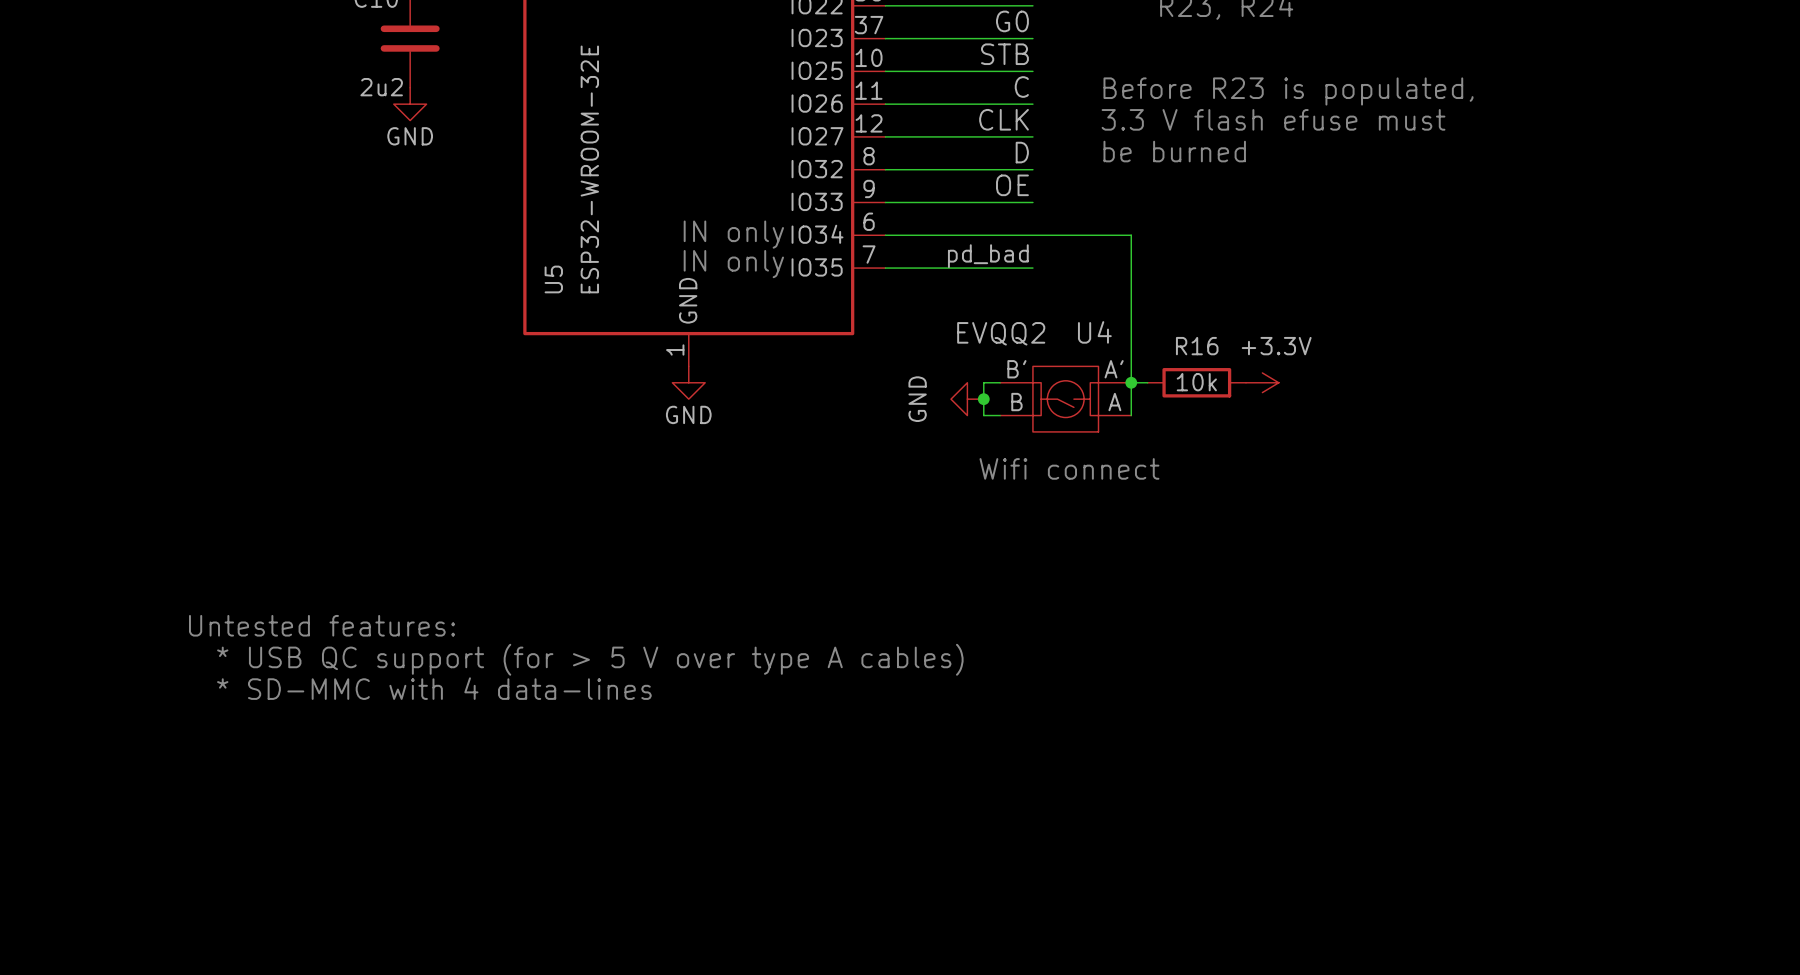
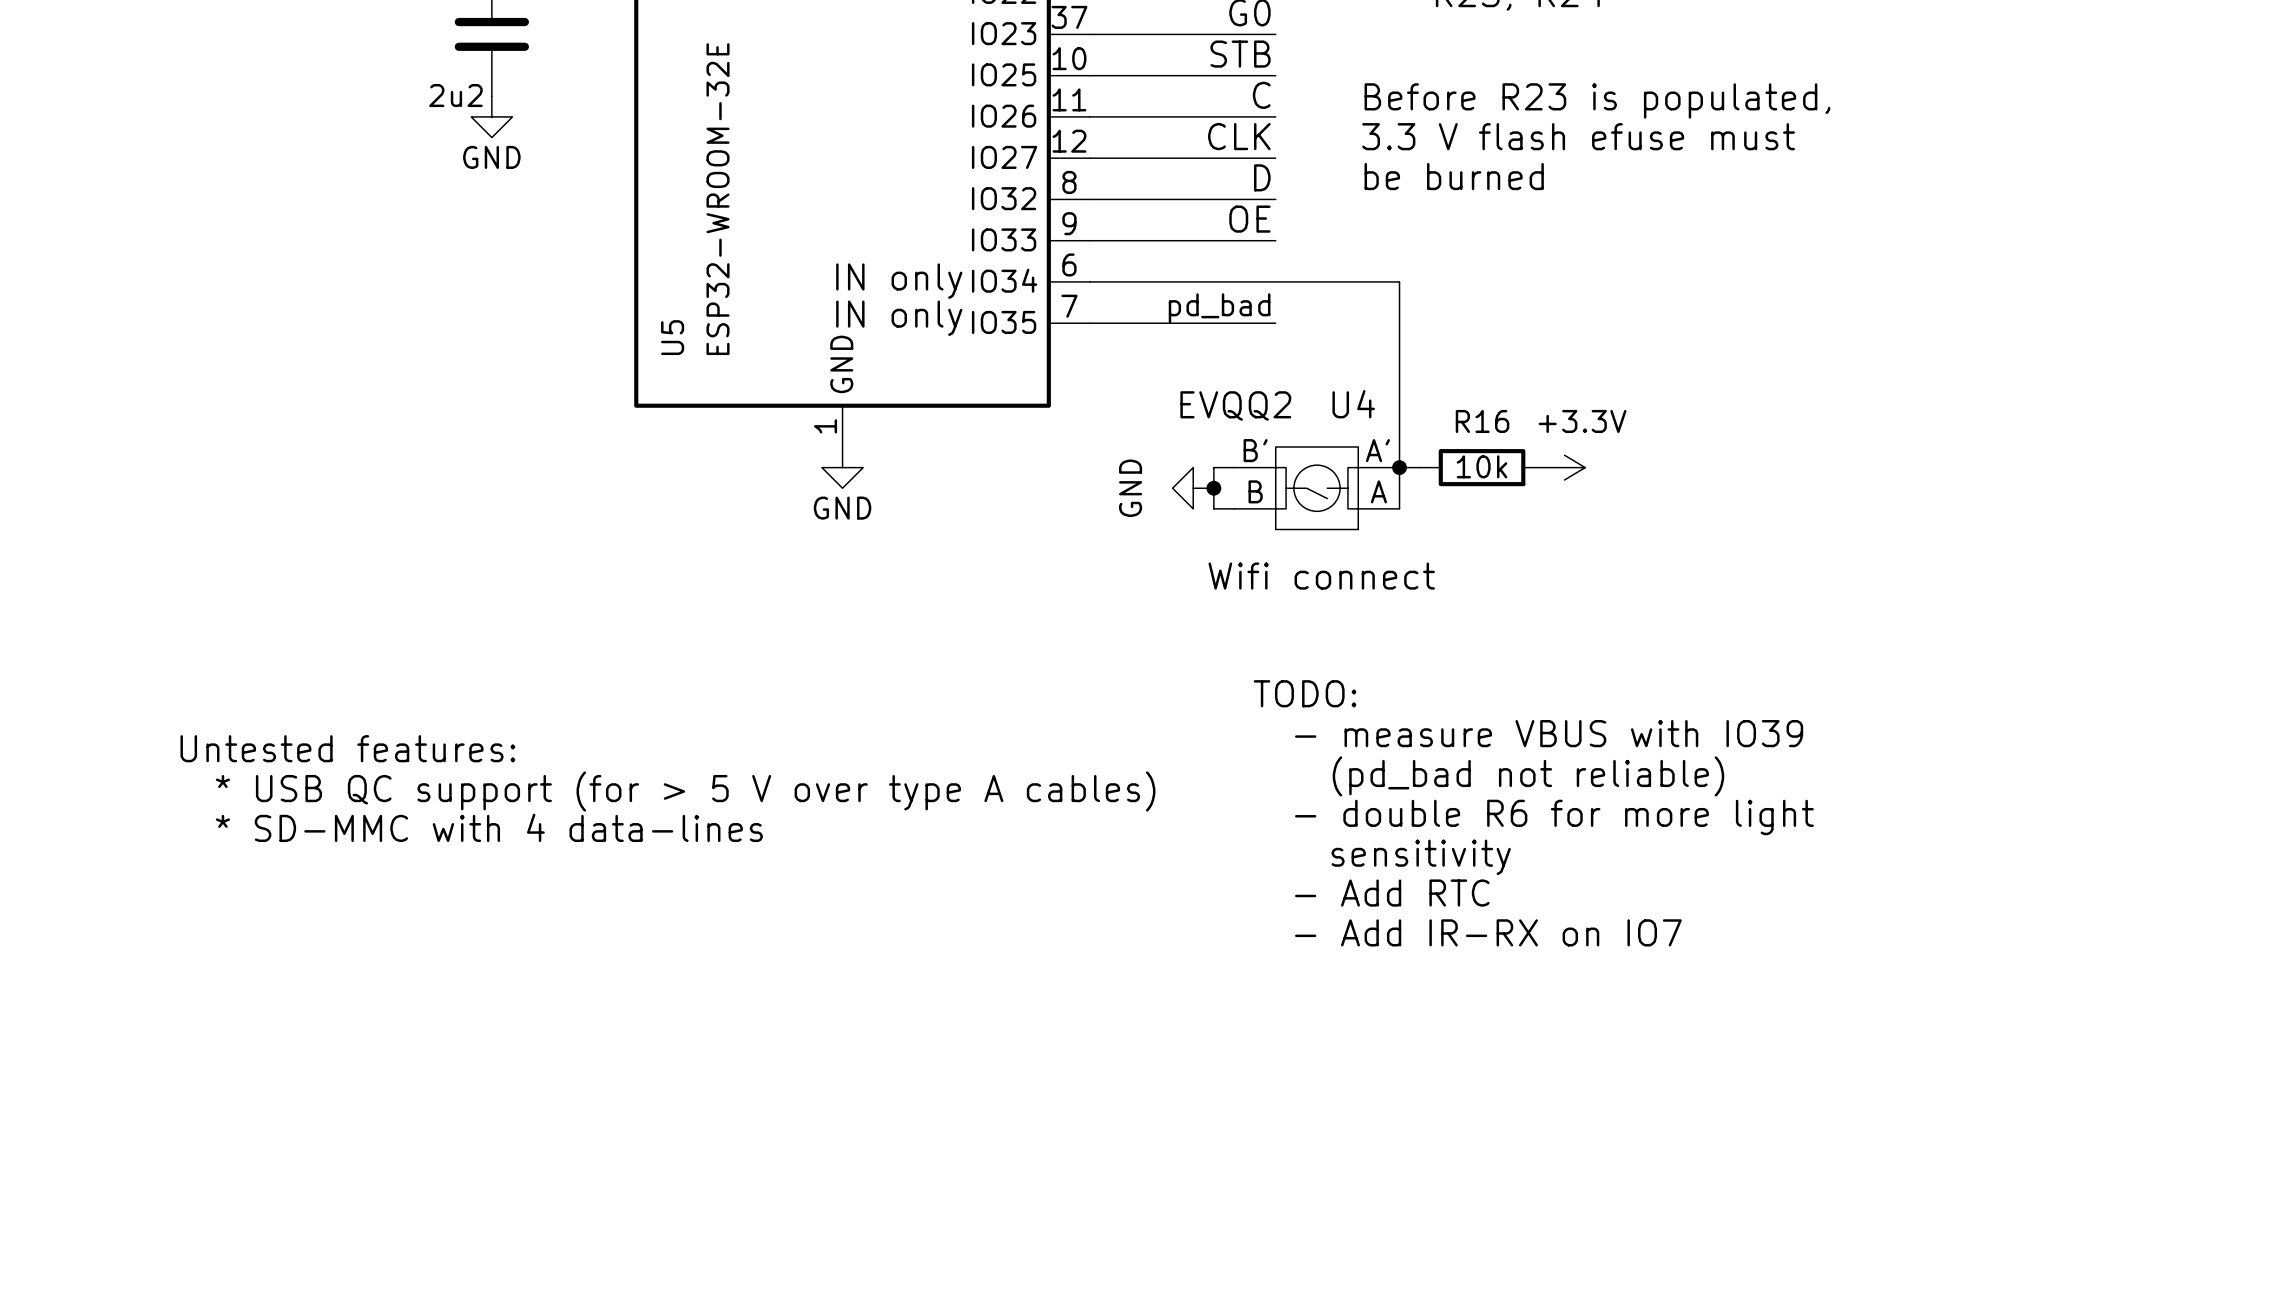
text: none -> TODO: (1305, 693)
text: none -> - measure VBUS with IO39 (1549, 733)
text position: Untested features: (322, 625) -> Untested features: (347, 748)
text: none -> (pd_bad not reliable) (1528, 776)
text position: * USB QC support (for > 5 V over type A cables) (590, 659) -> * USB QC support (for > 5 V over type A cables) (685, 791)
text: none -> - double R6 for more light (1554, 817)
text position: * SD-MMC with 4 data-lines (434, 688) -> * SD-MMC with 4 data-lines (489, 827)
text: none -> sensitivity (1421, 857)
text: none -> - Add RTC (1392, 893)
text: none -> - Add IR-RX on IO7 (1488, 932)

